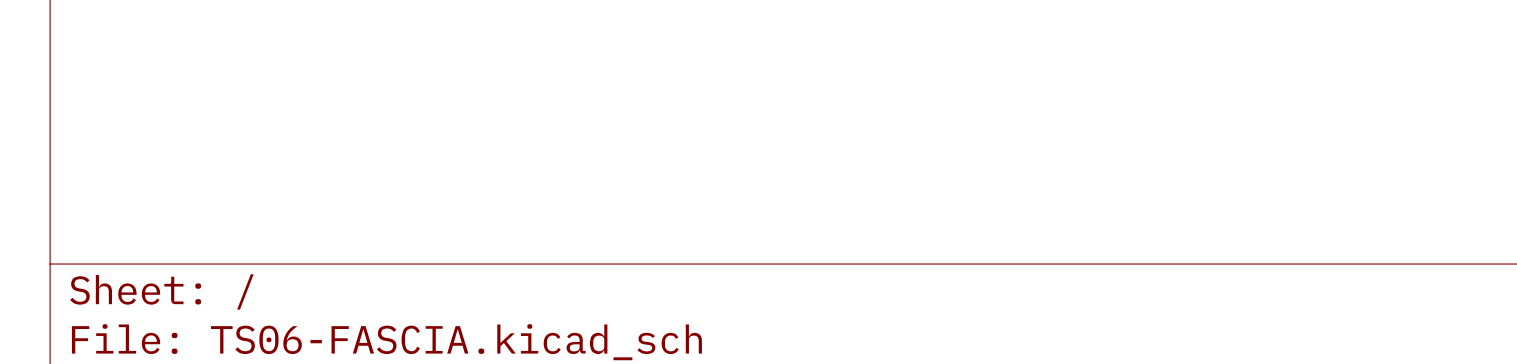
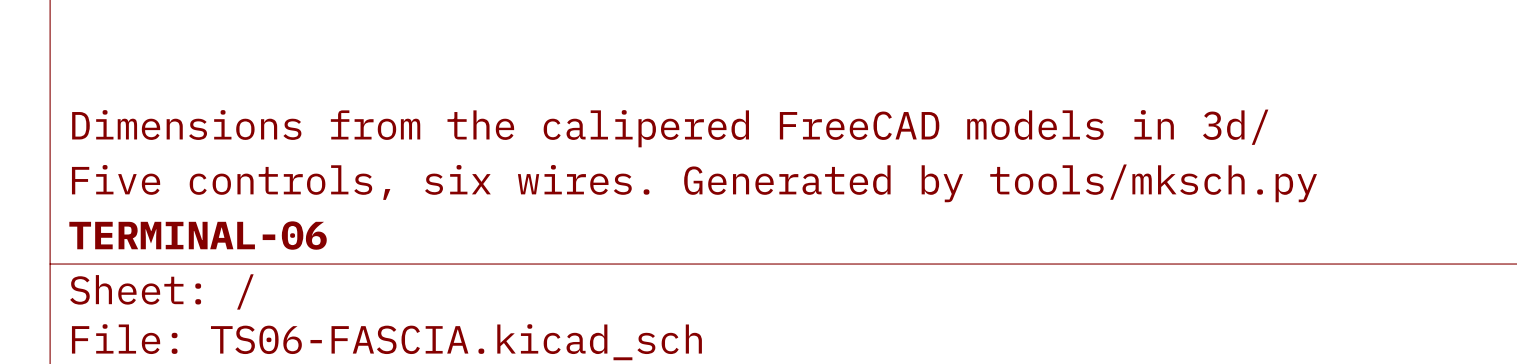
title block: none -> Dimensions from the calipered FreeCAD models in 3d/ (670, 128)
title block: none -> Five controls, six wires. Generated by tools/mksch.py (694, 183)
title block: none -> TERMINAL-06 (198, 235)

